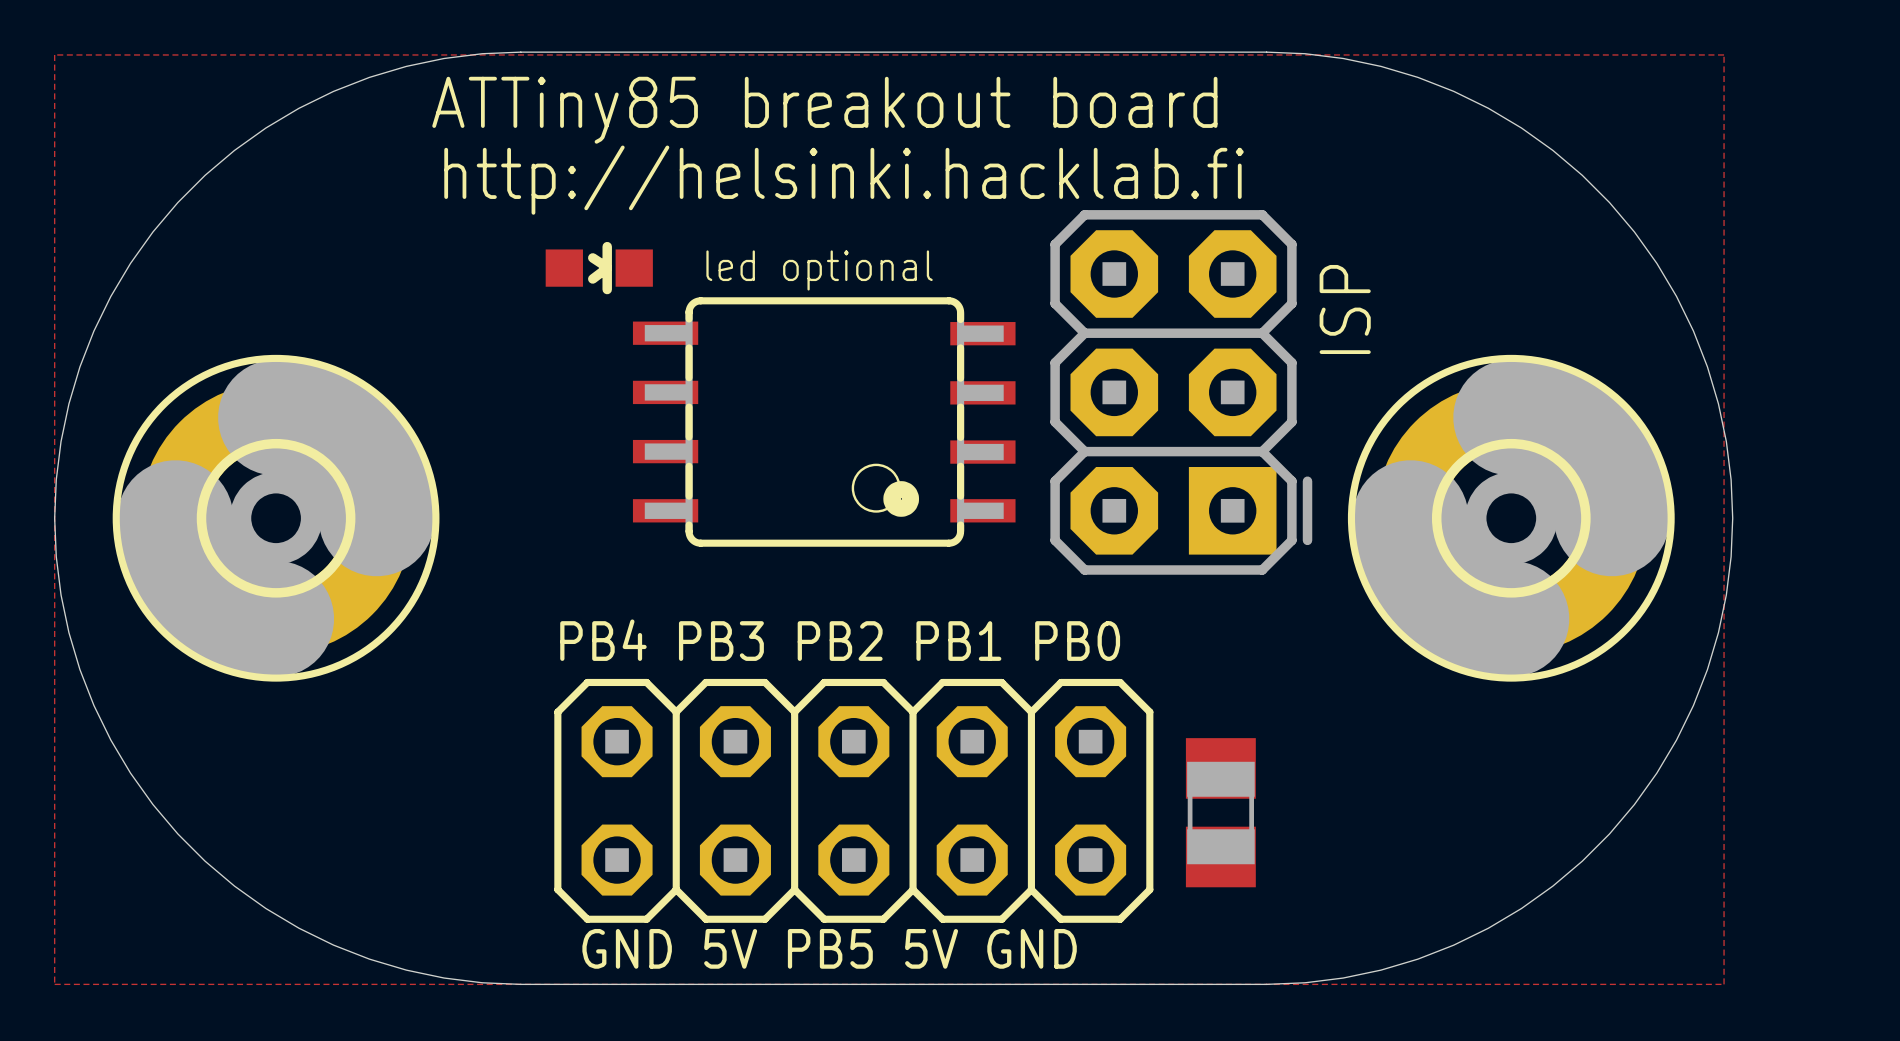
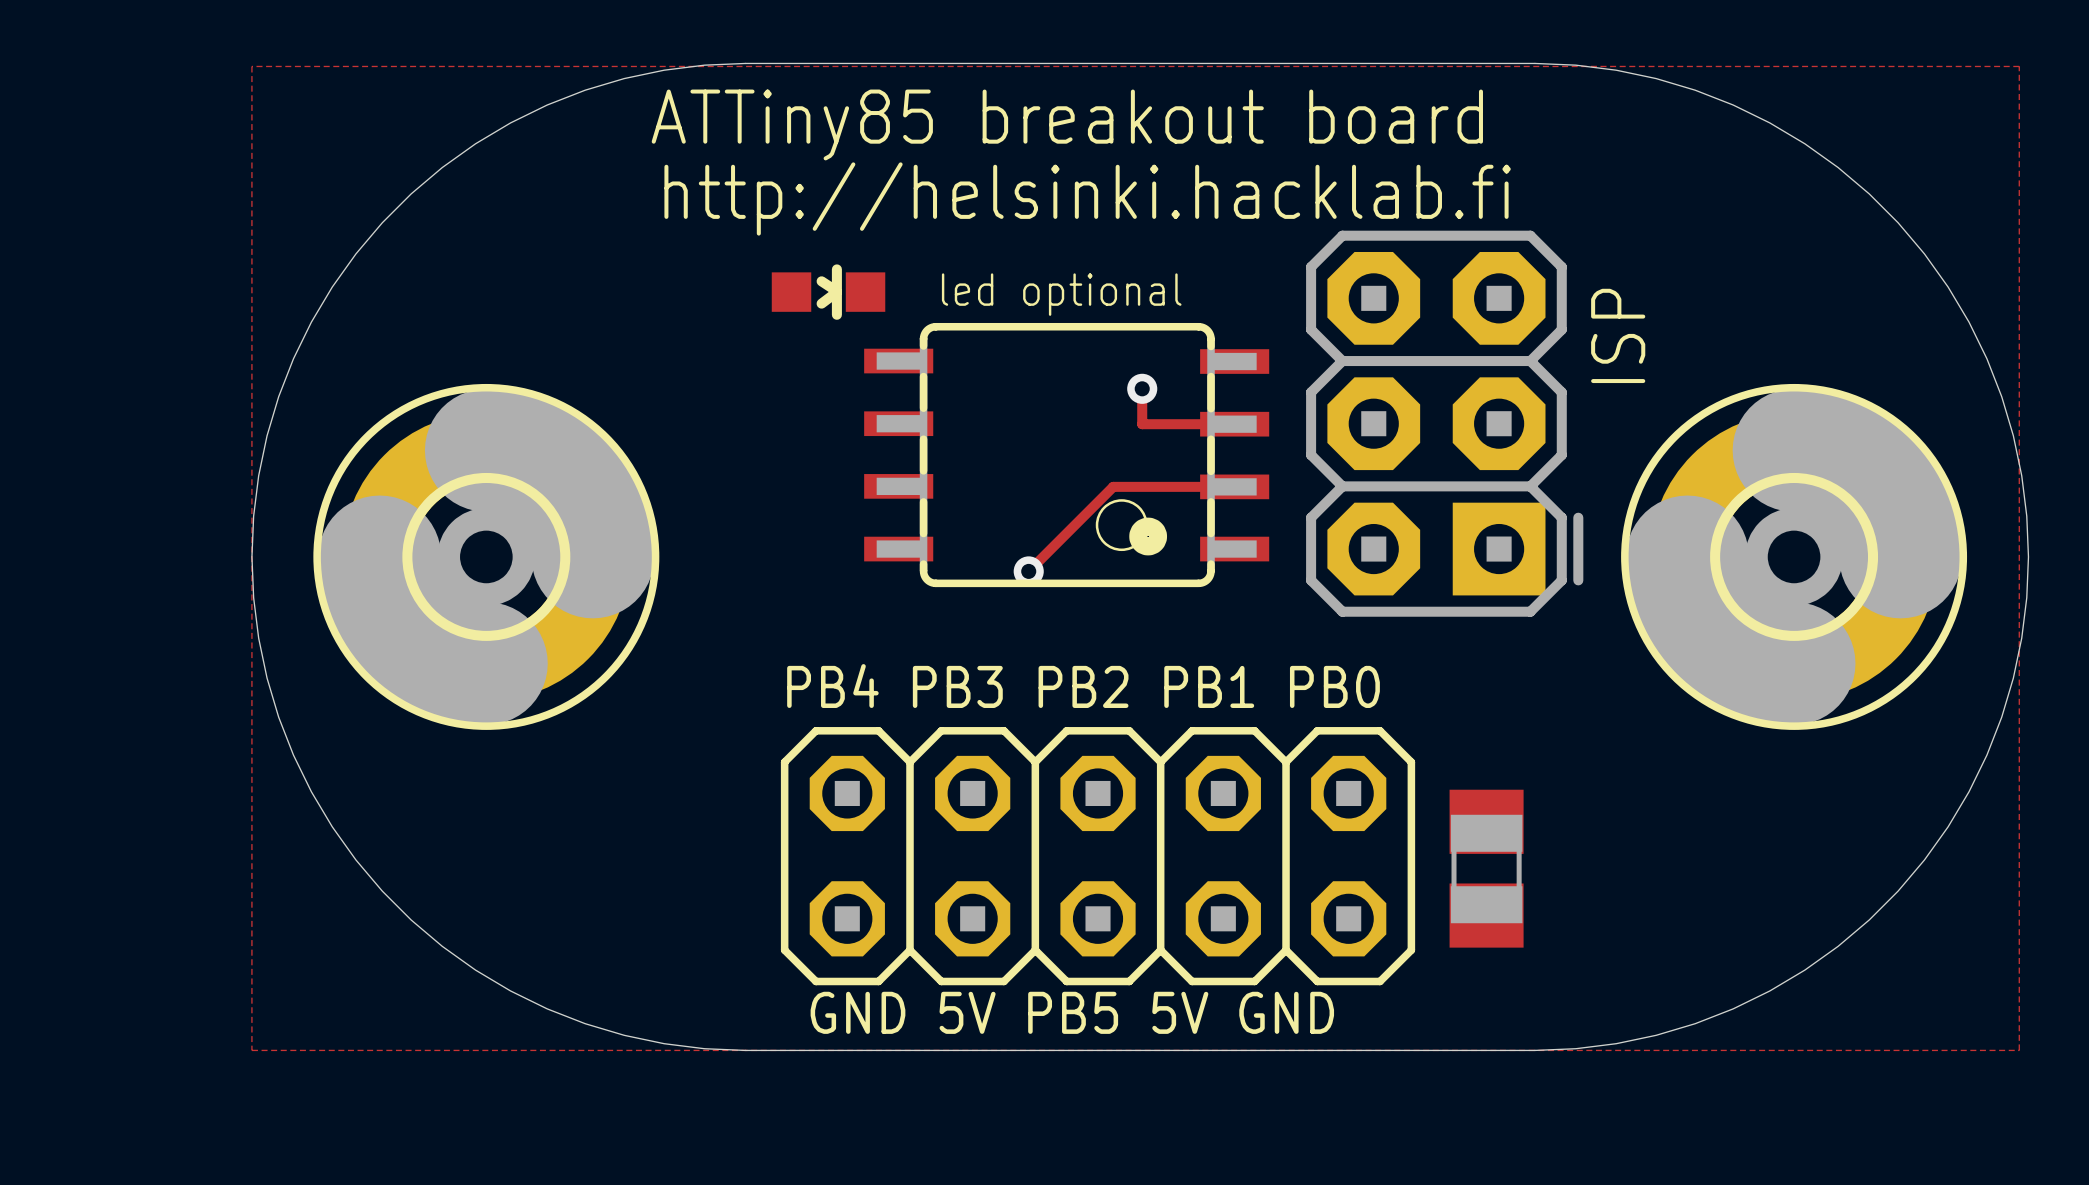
track: none -> (1142, 388) (1142, 424) (1234, 424)
via: none -> (1142, 388)
track: none -> (1234, 486) (1113, 486) (1028, 571)
via: none -> (1028, 571)

